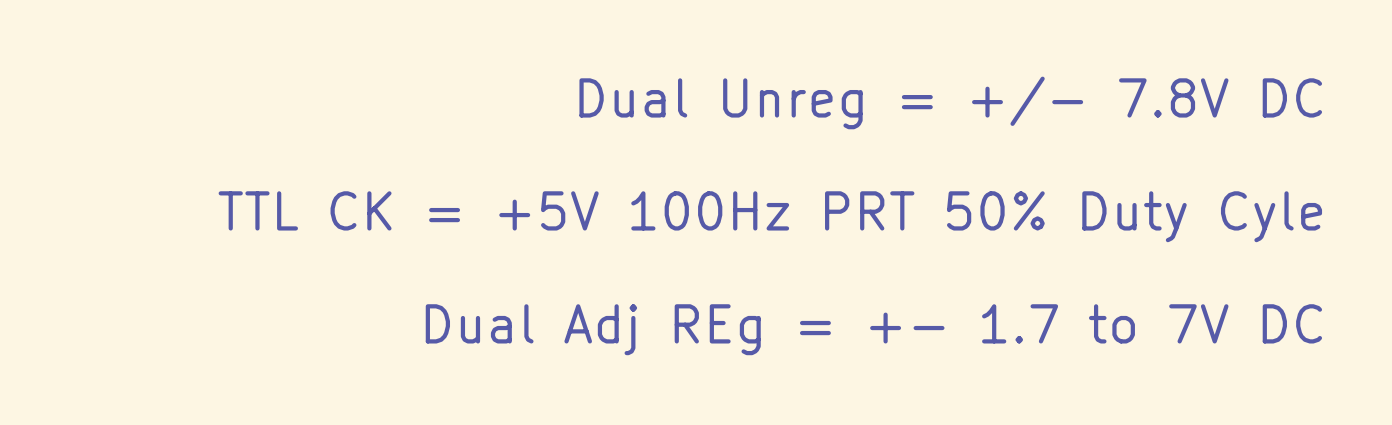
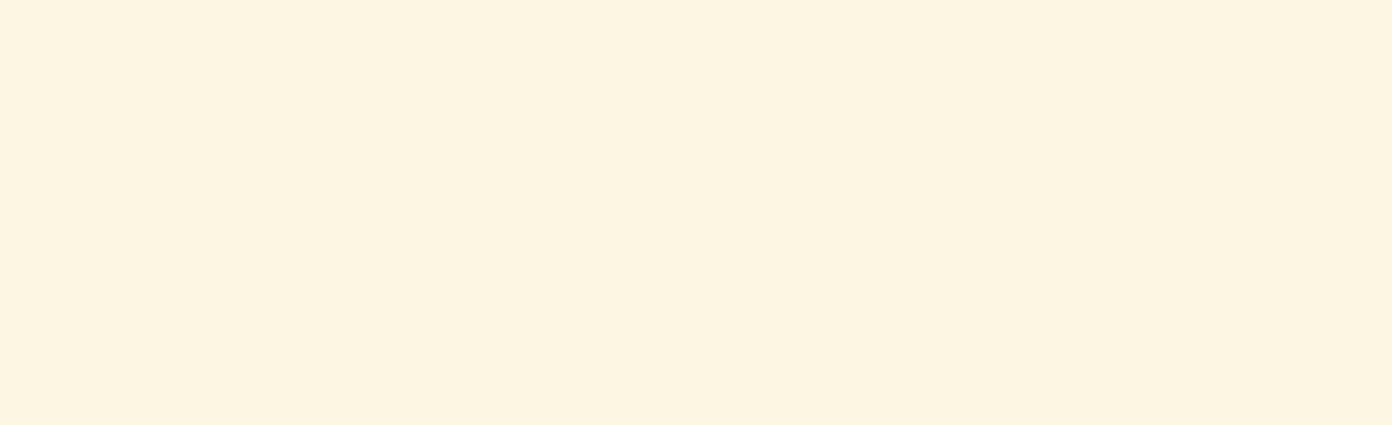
text: Dual Unreg = +/- 7.8V DC (950, 102) -> none
text: TTL CK = +5V 100Hz PRT 50% Duty Cyle (770, 216) -> none
text: Dual Adj REg = +- 1.7 to 7V DC (873, 329) -> none

